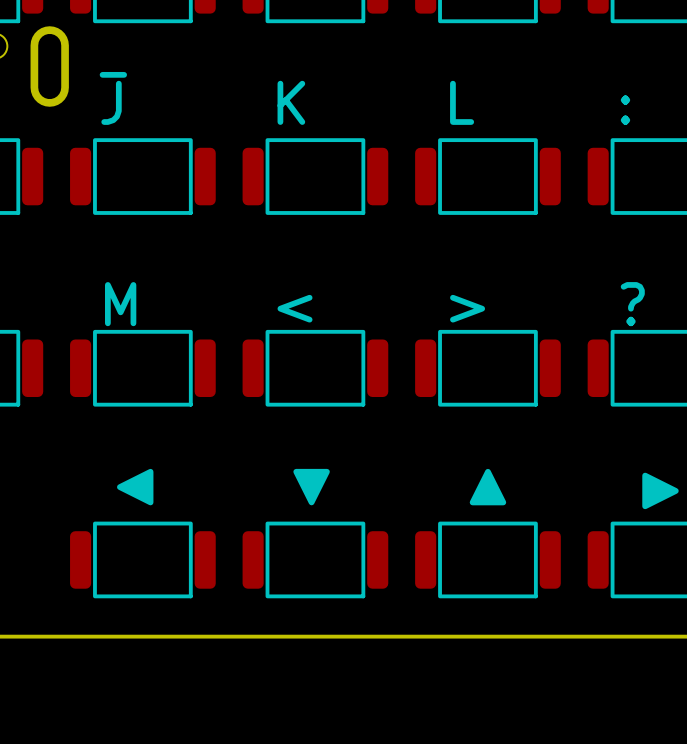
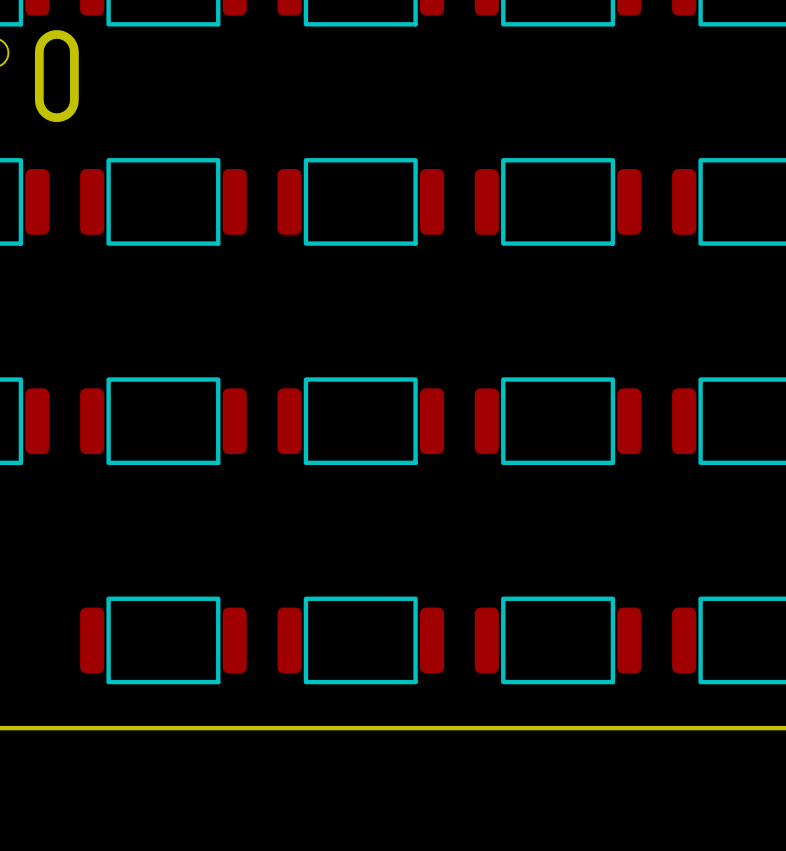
text: ~{J} (113, 98) -> none
text: K (291, 102) -> none
text: L (462, 102) -> none
text: : (625, 110) -> none
text: M (120, 304) -> none
text: ? (632, 304) -> none
text: < (295, 308) -> none
text: > (467, 308) -> none
drawing: [117, 468, 154, 506] -> none
drawing: [293, 468, 330, 506] -> none
drawing: [469, 468, 507, 506] -> none
drawing: [642, 472, 679, 510] -> none

